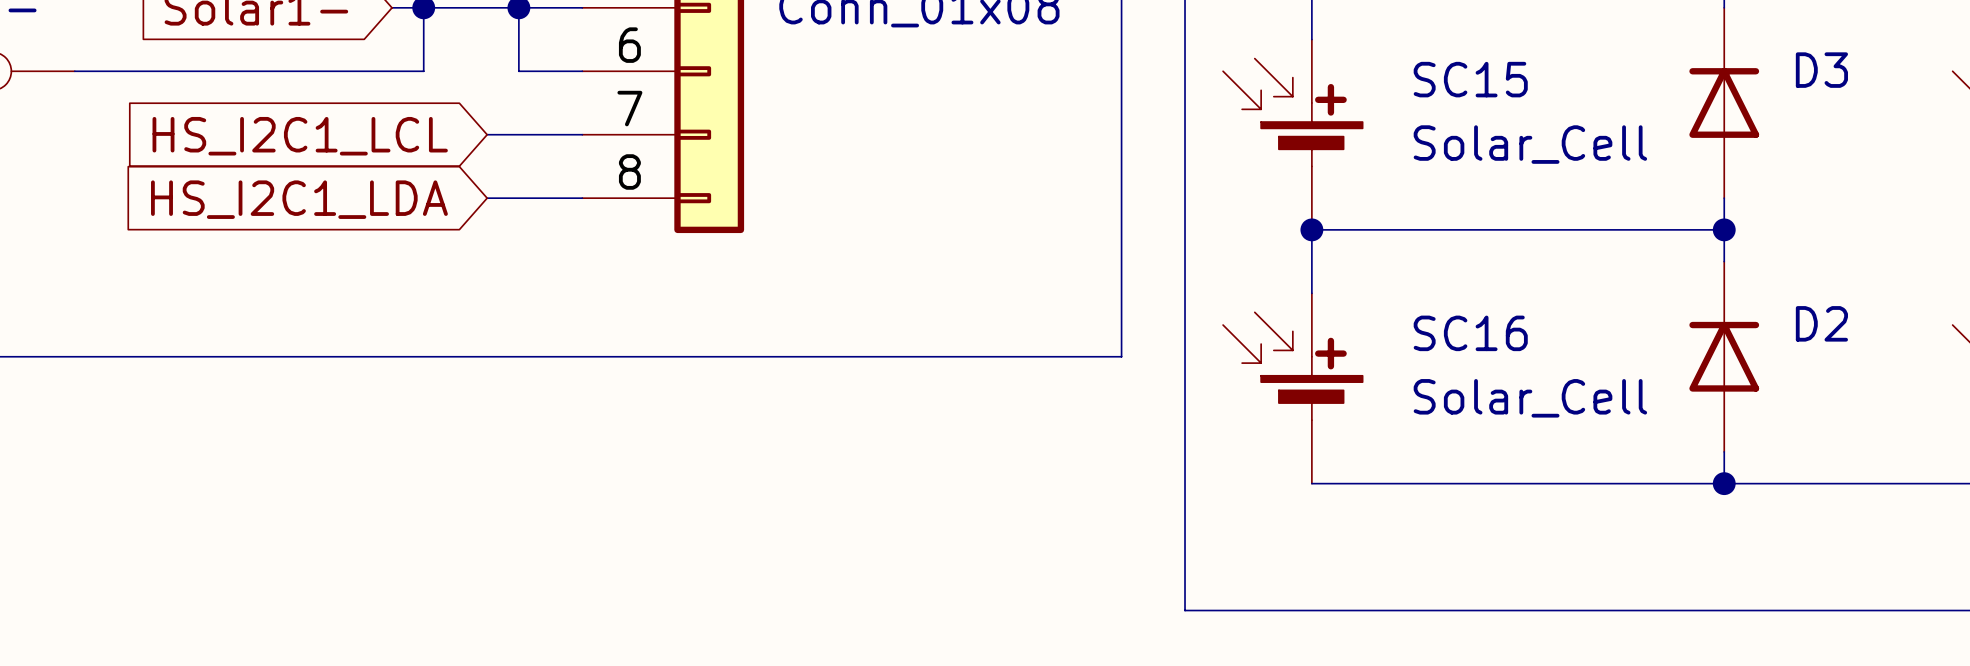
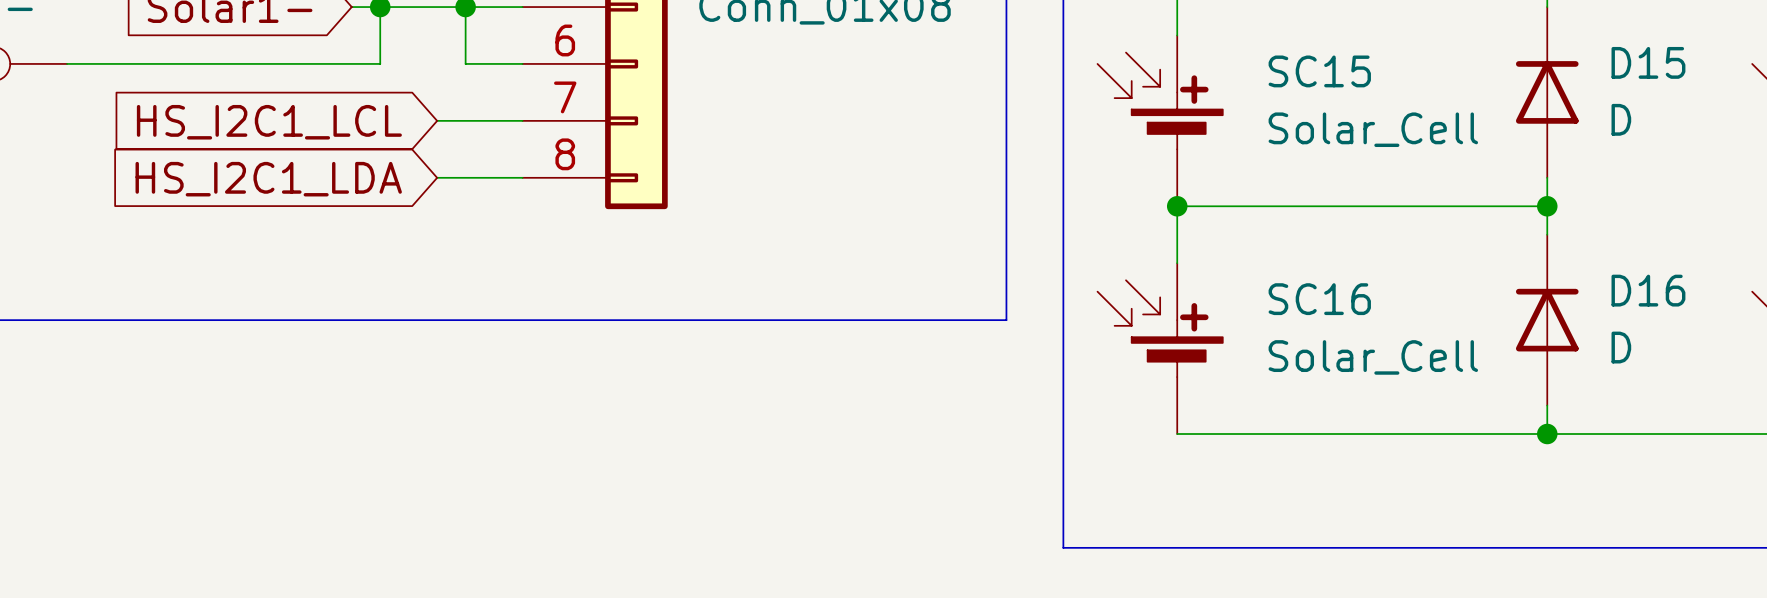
D3 name: D3 (1821, 70) -> D15 (1648, 62)
D3 value: none -> D (1621, 119)
D2 name: D2 (1821, 323) -> D16 (1648, 290)
D2 value: none -> D (1621, 347)

